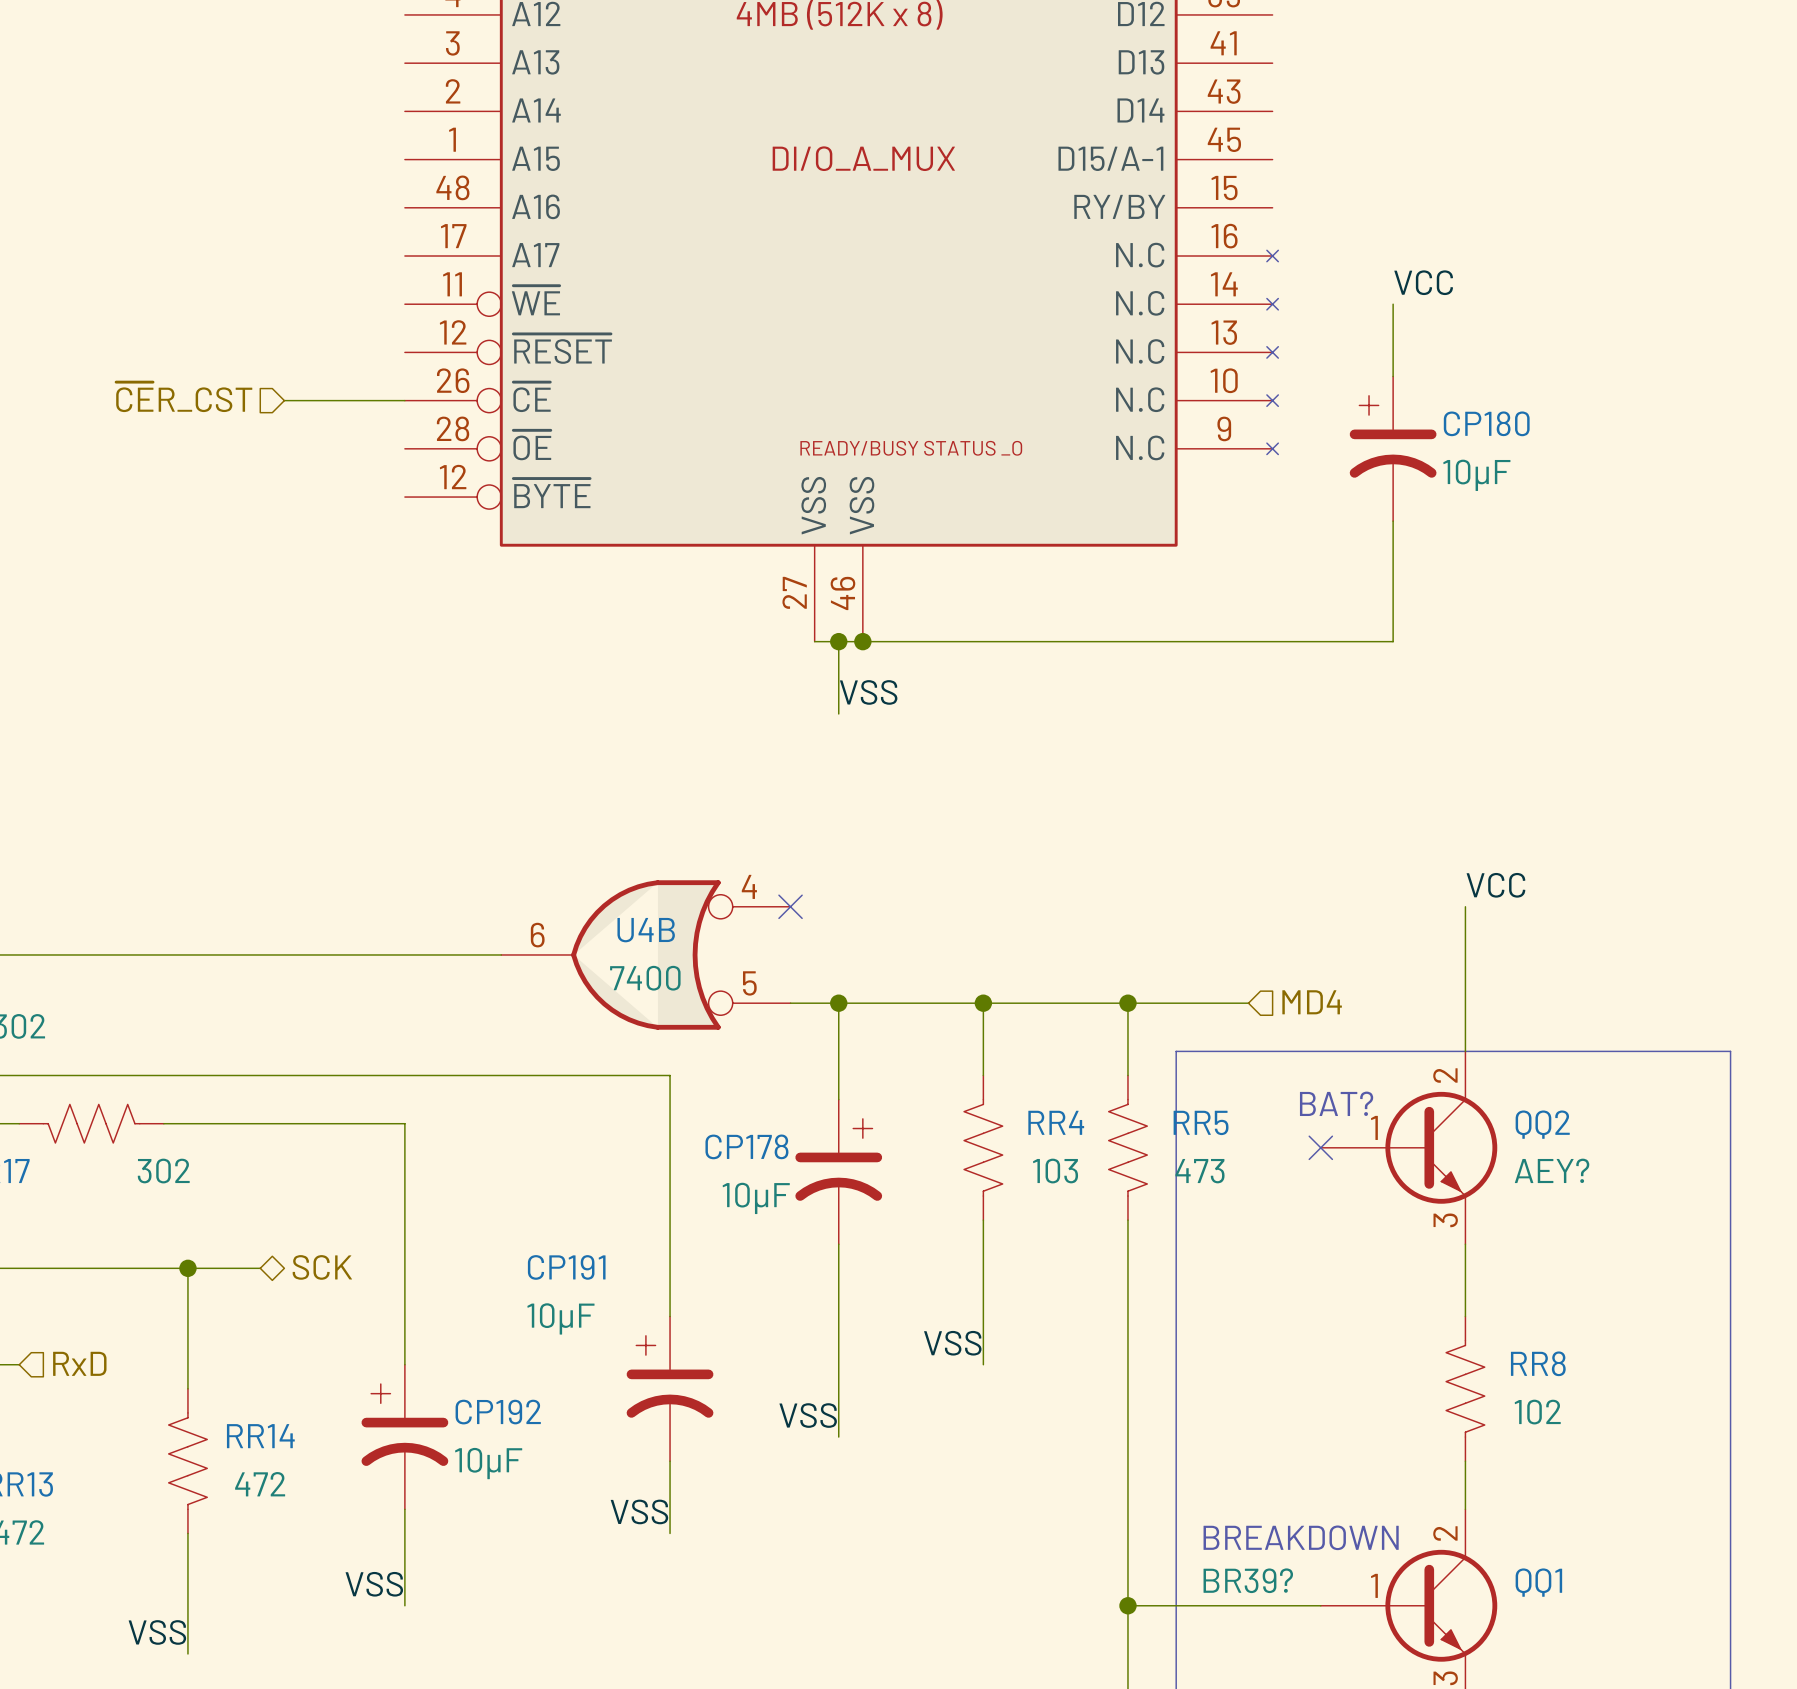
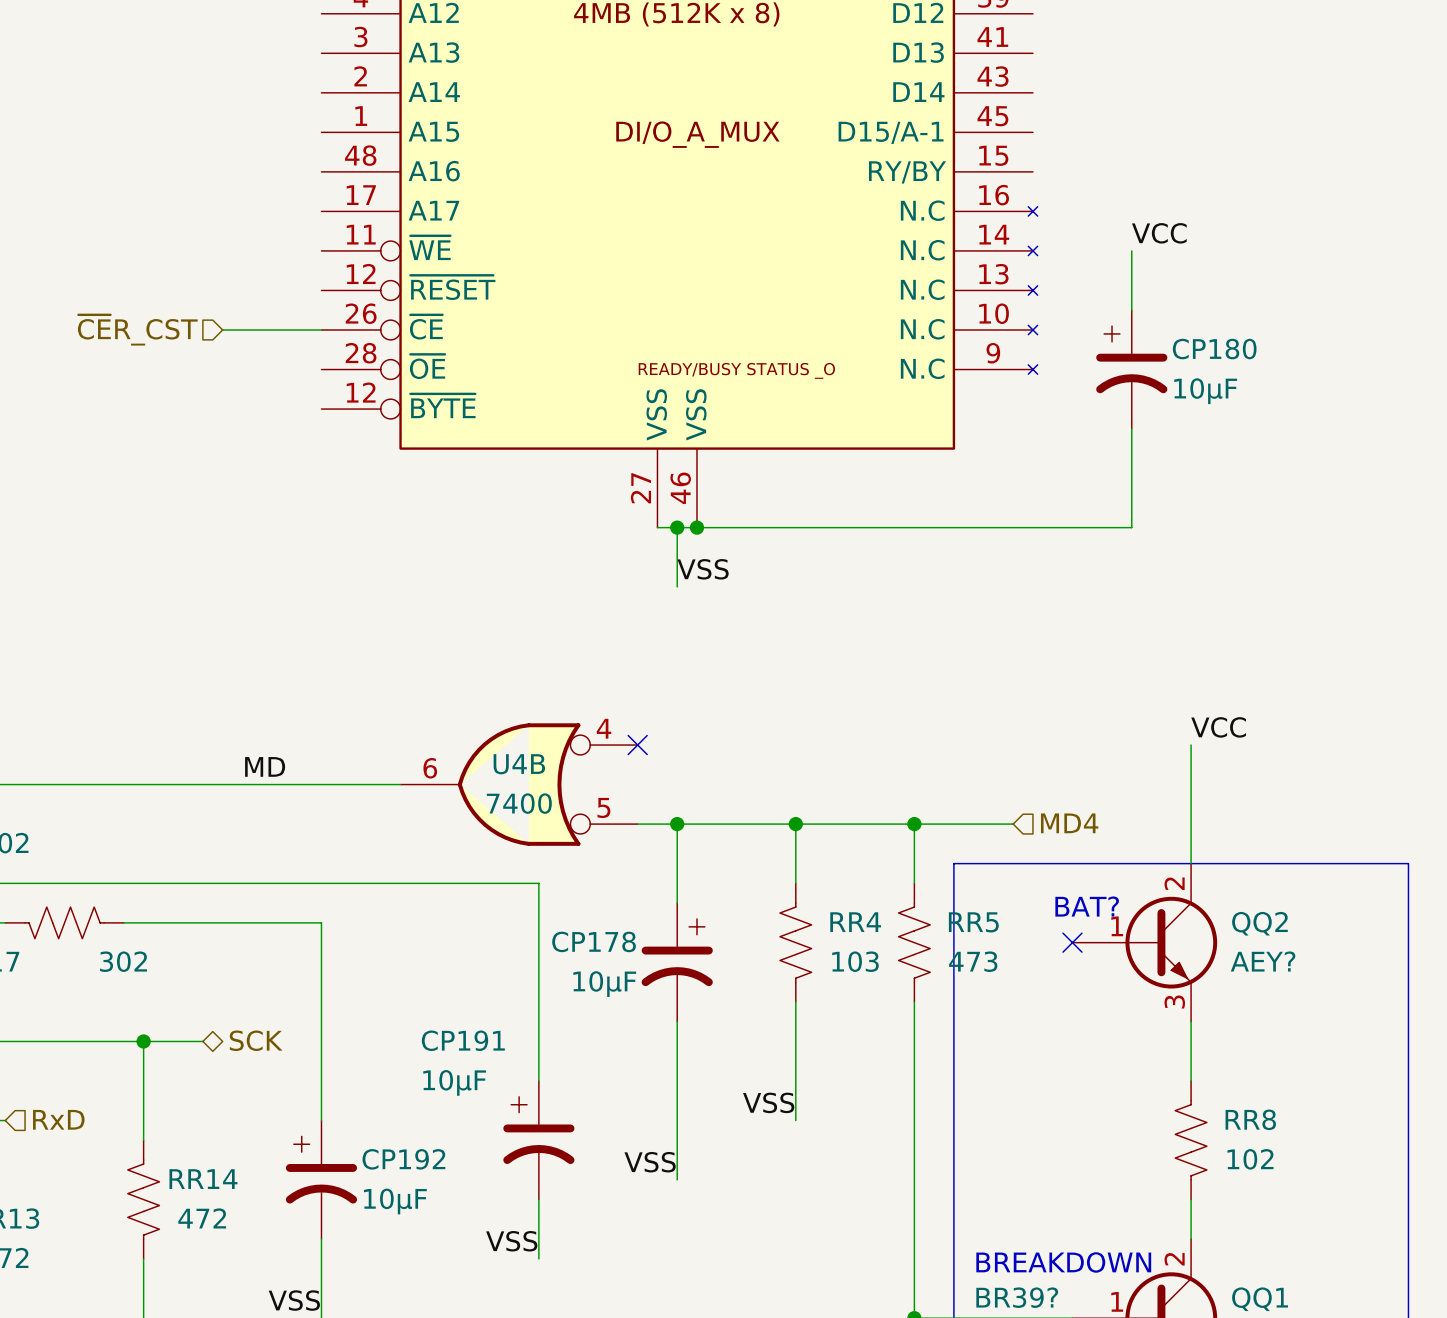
label: none -> MD (265, 766)

